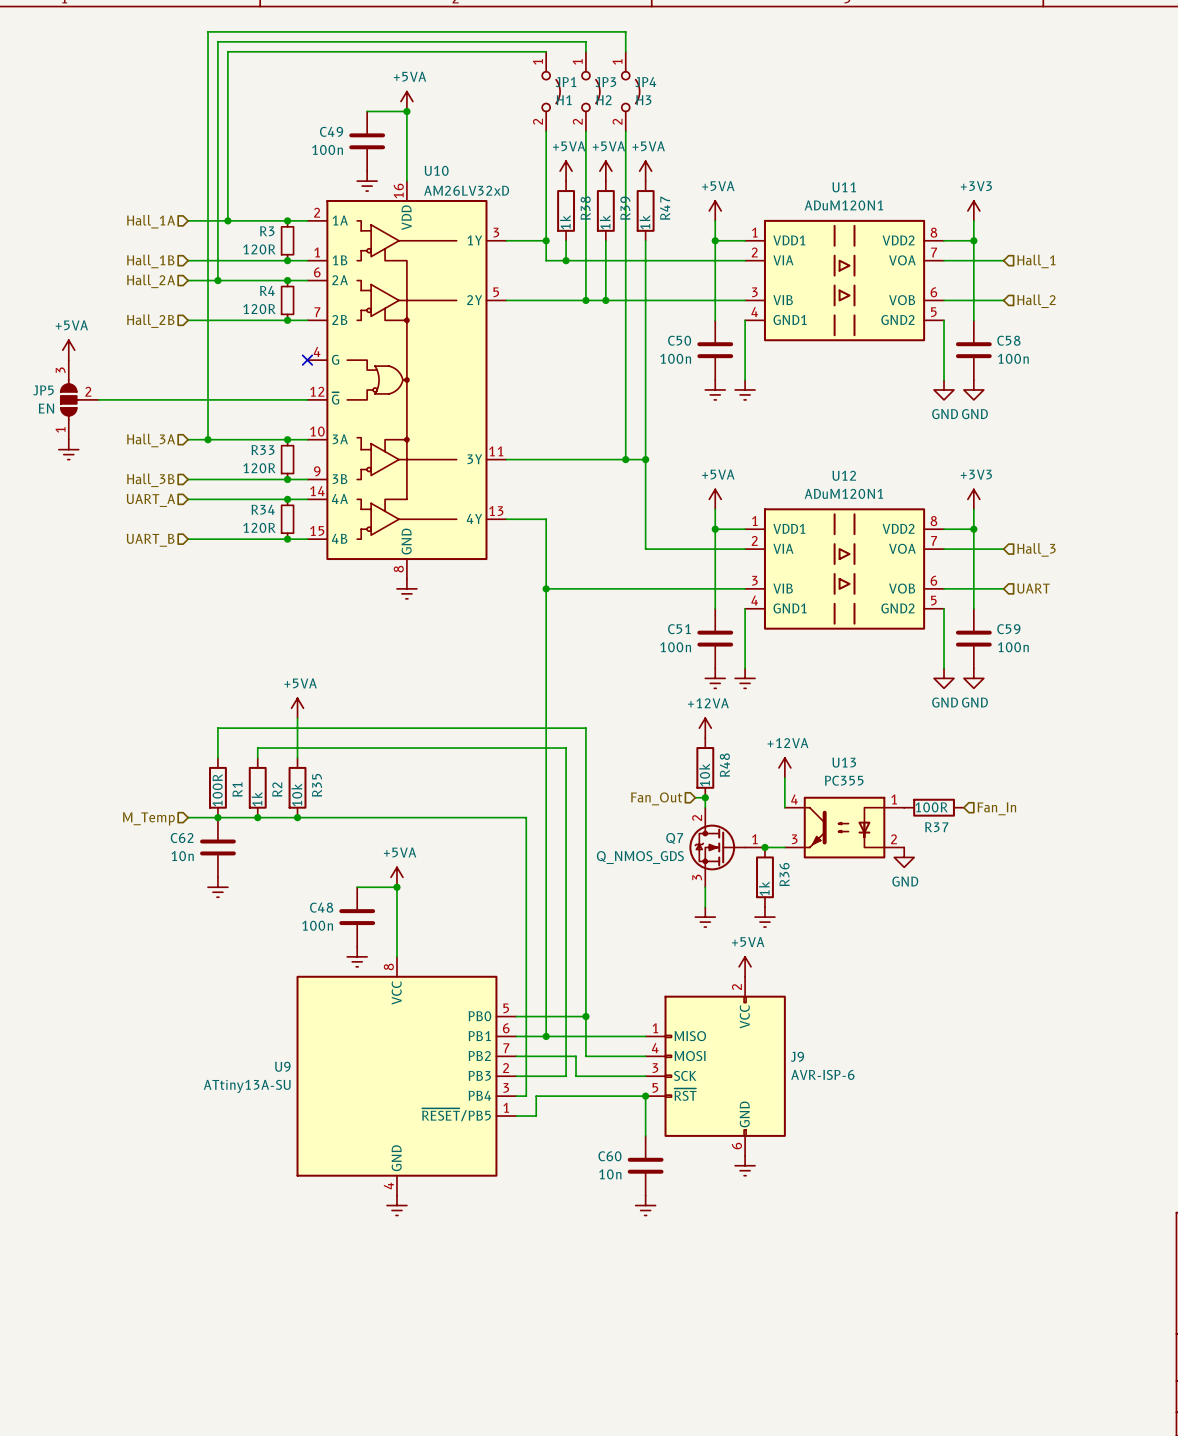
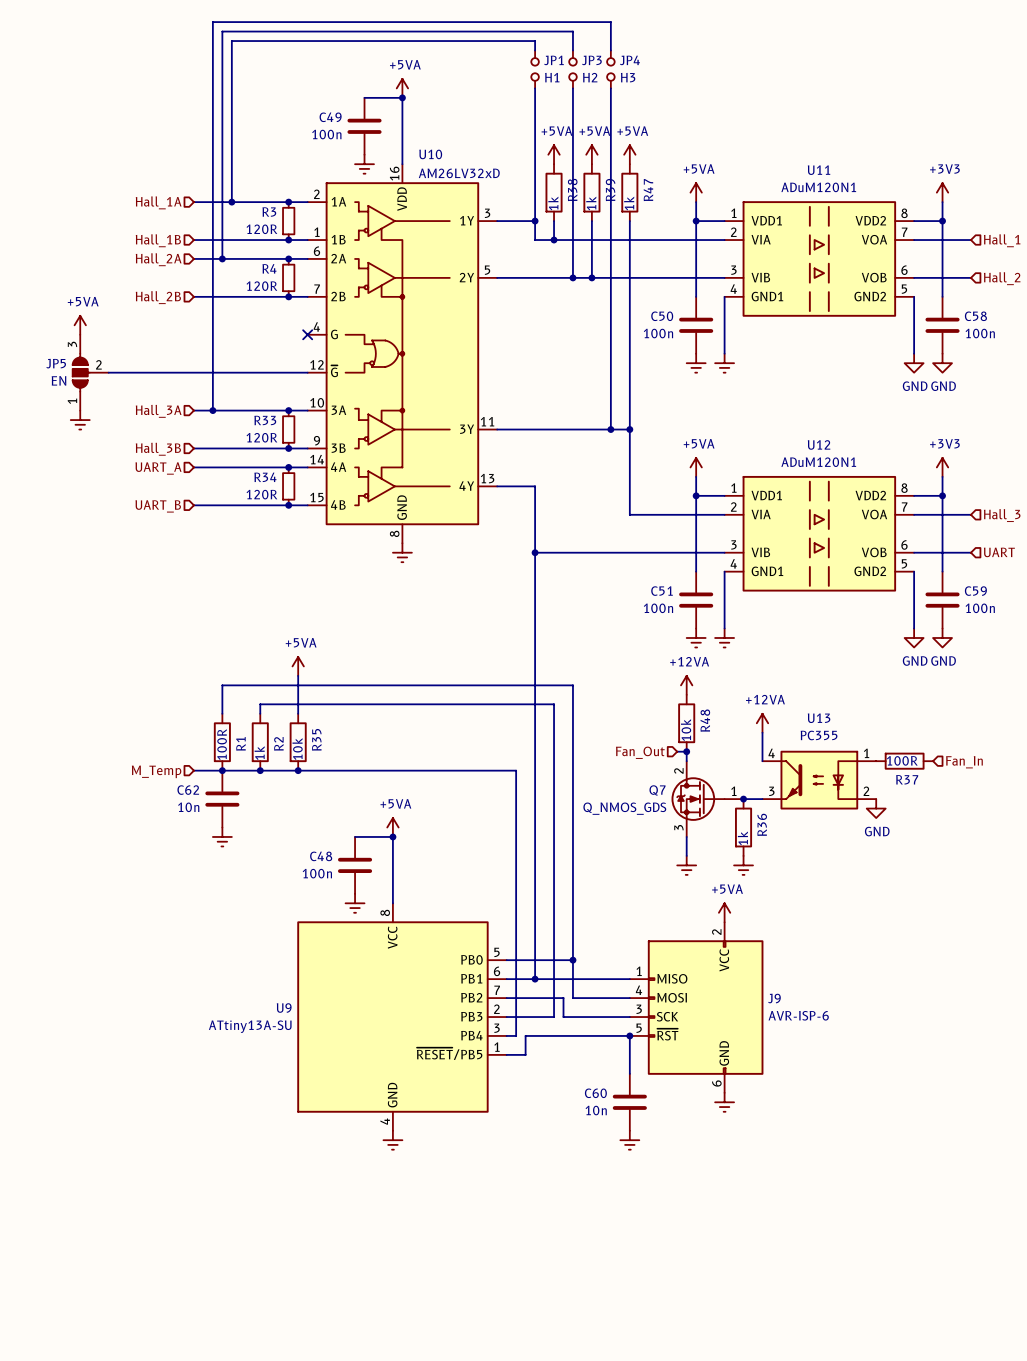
JP1 symbol: [542, 51, 561, 132] -> [531, 50, 539, 89]
JP3 symbol: [581, 51, 600, 132] -> [569, 50, 577, 89]
JP4 symbol: [621, 51, 640, 132] -> [607, 50, 615, 89]

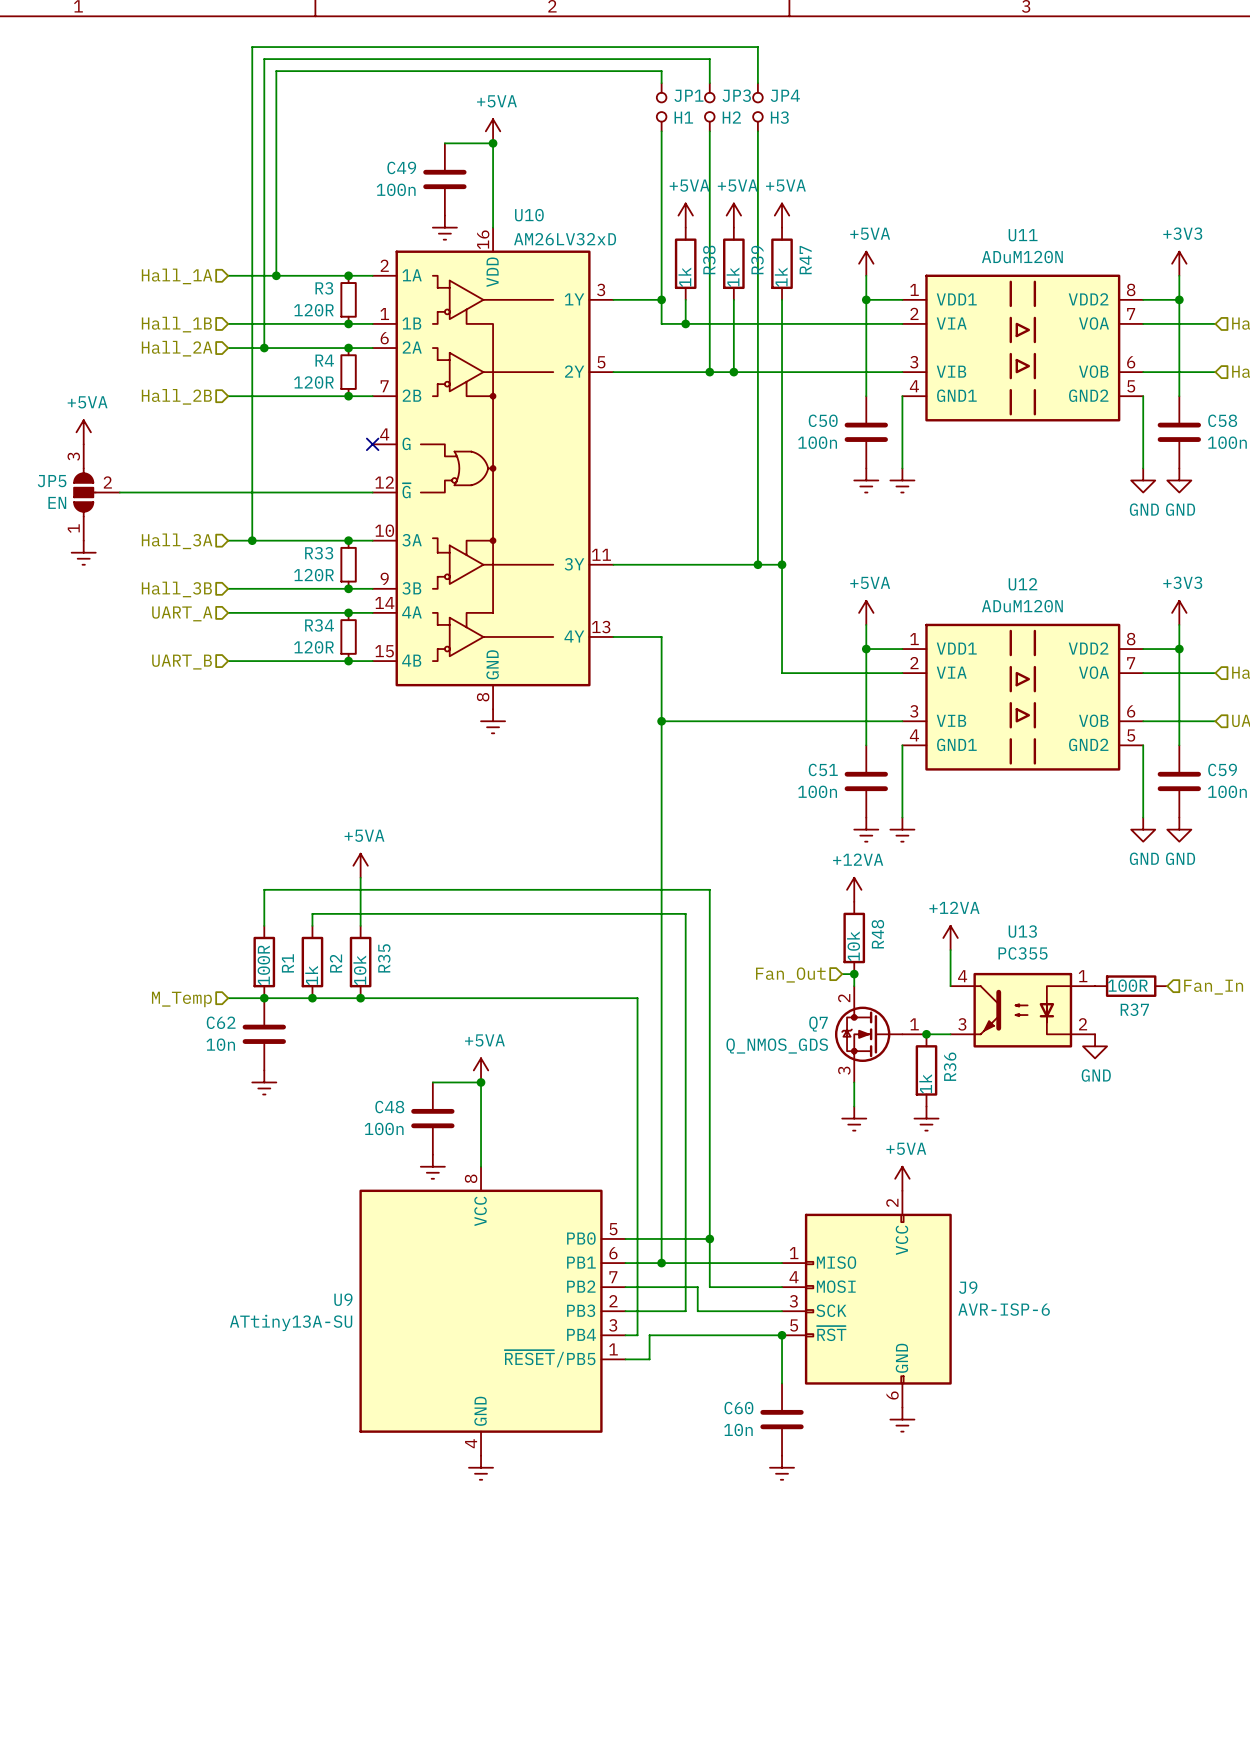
U11 value: ADuM120N1 (818, 187) -> ADuM120N (1022, 257)
U12 value: ADuM120N1 (818, 462) -> ADuM120N (1022, 606)

